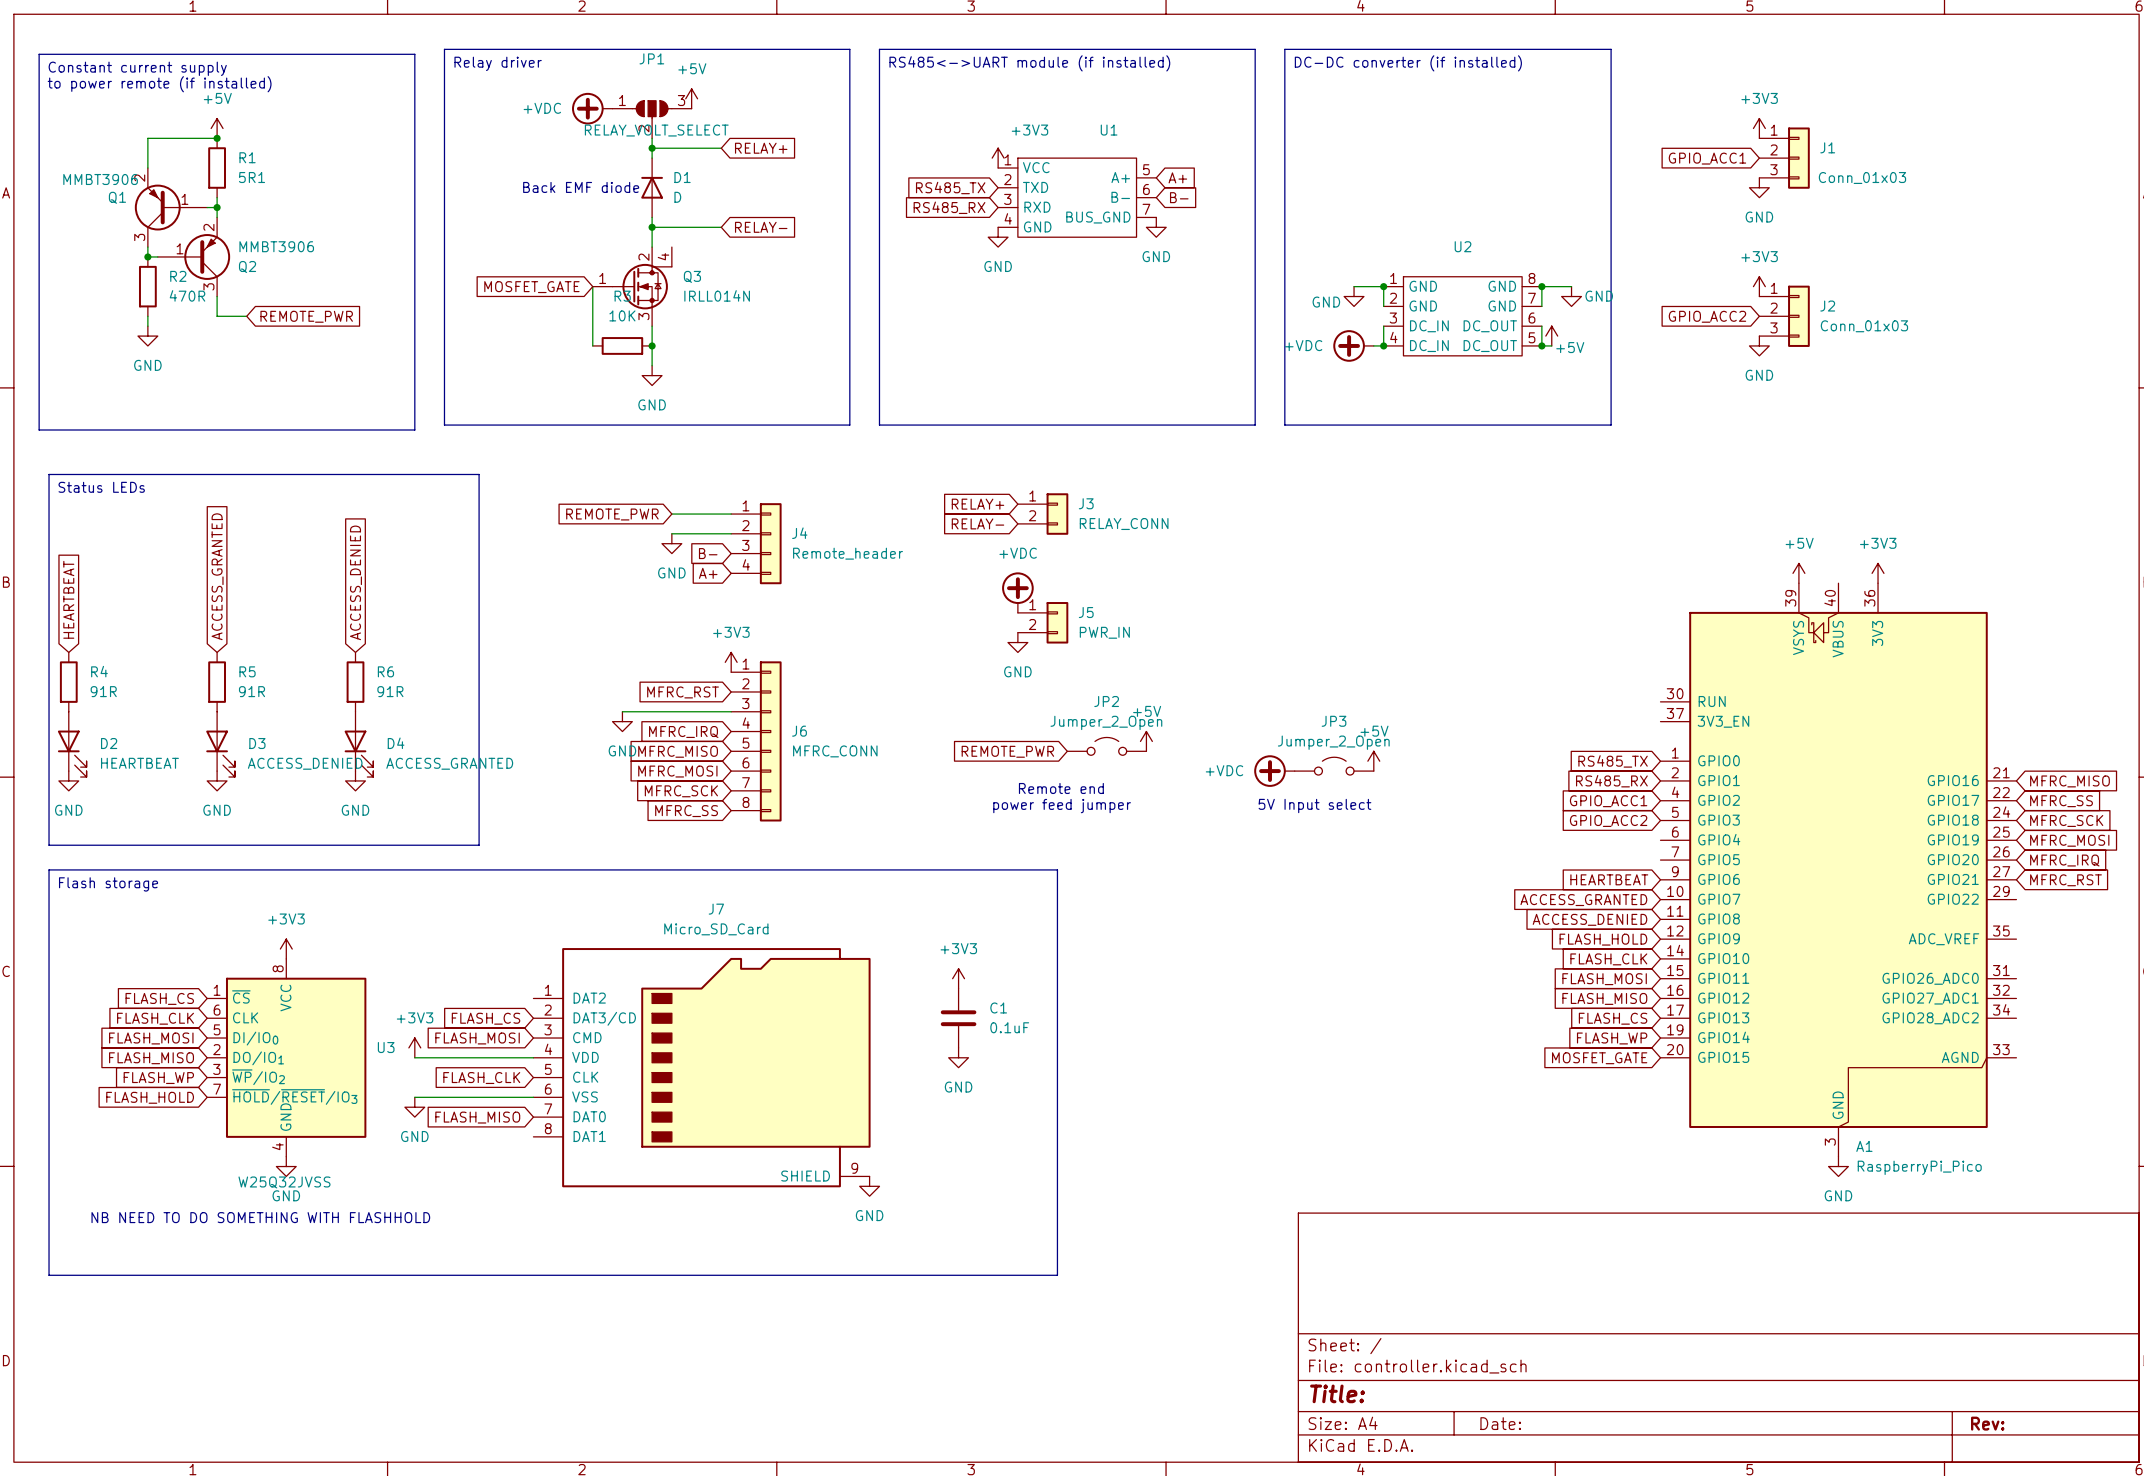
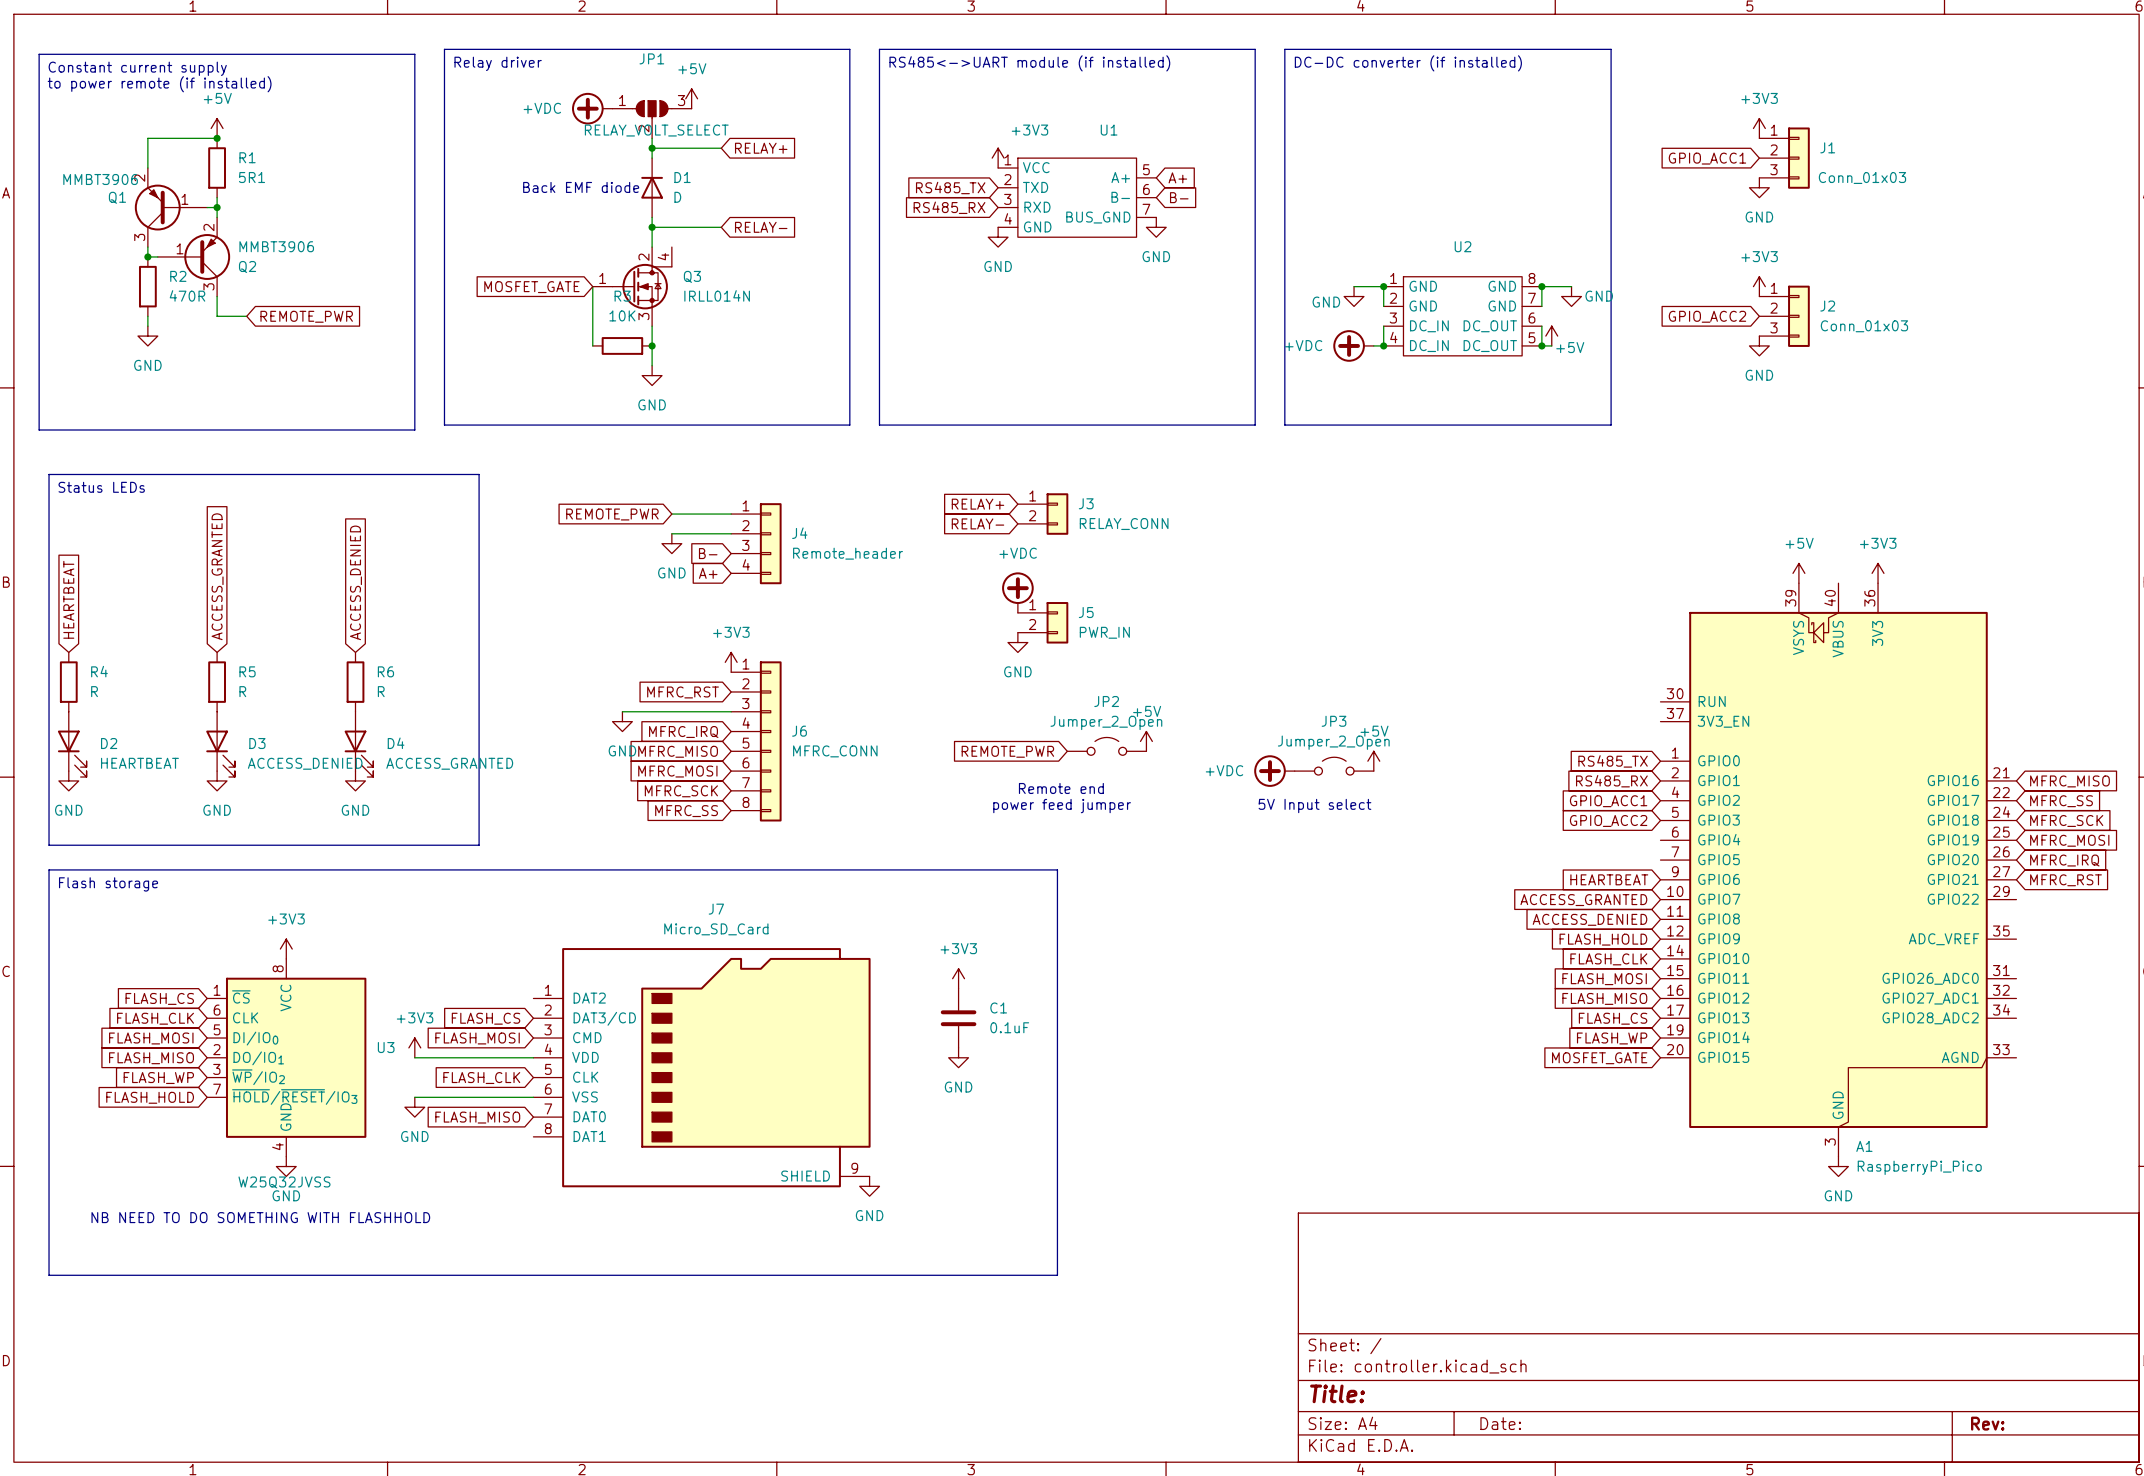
R4 value: 91R (103, 691) -> R (94, 691)
R5 value: 91R (252, 691) -> R (242, 691)
R6 value: 91R (390, 691) -> R (381, 691)

